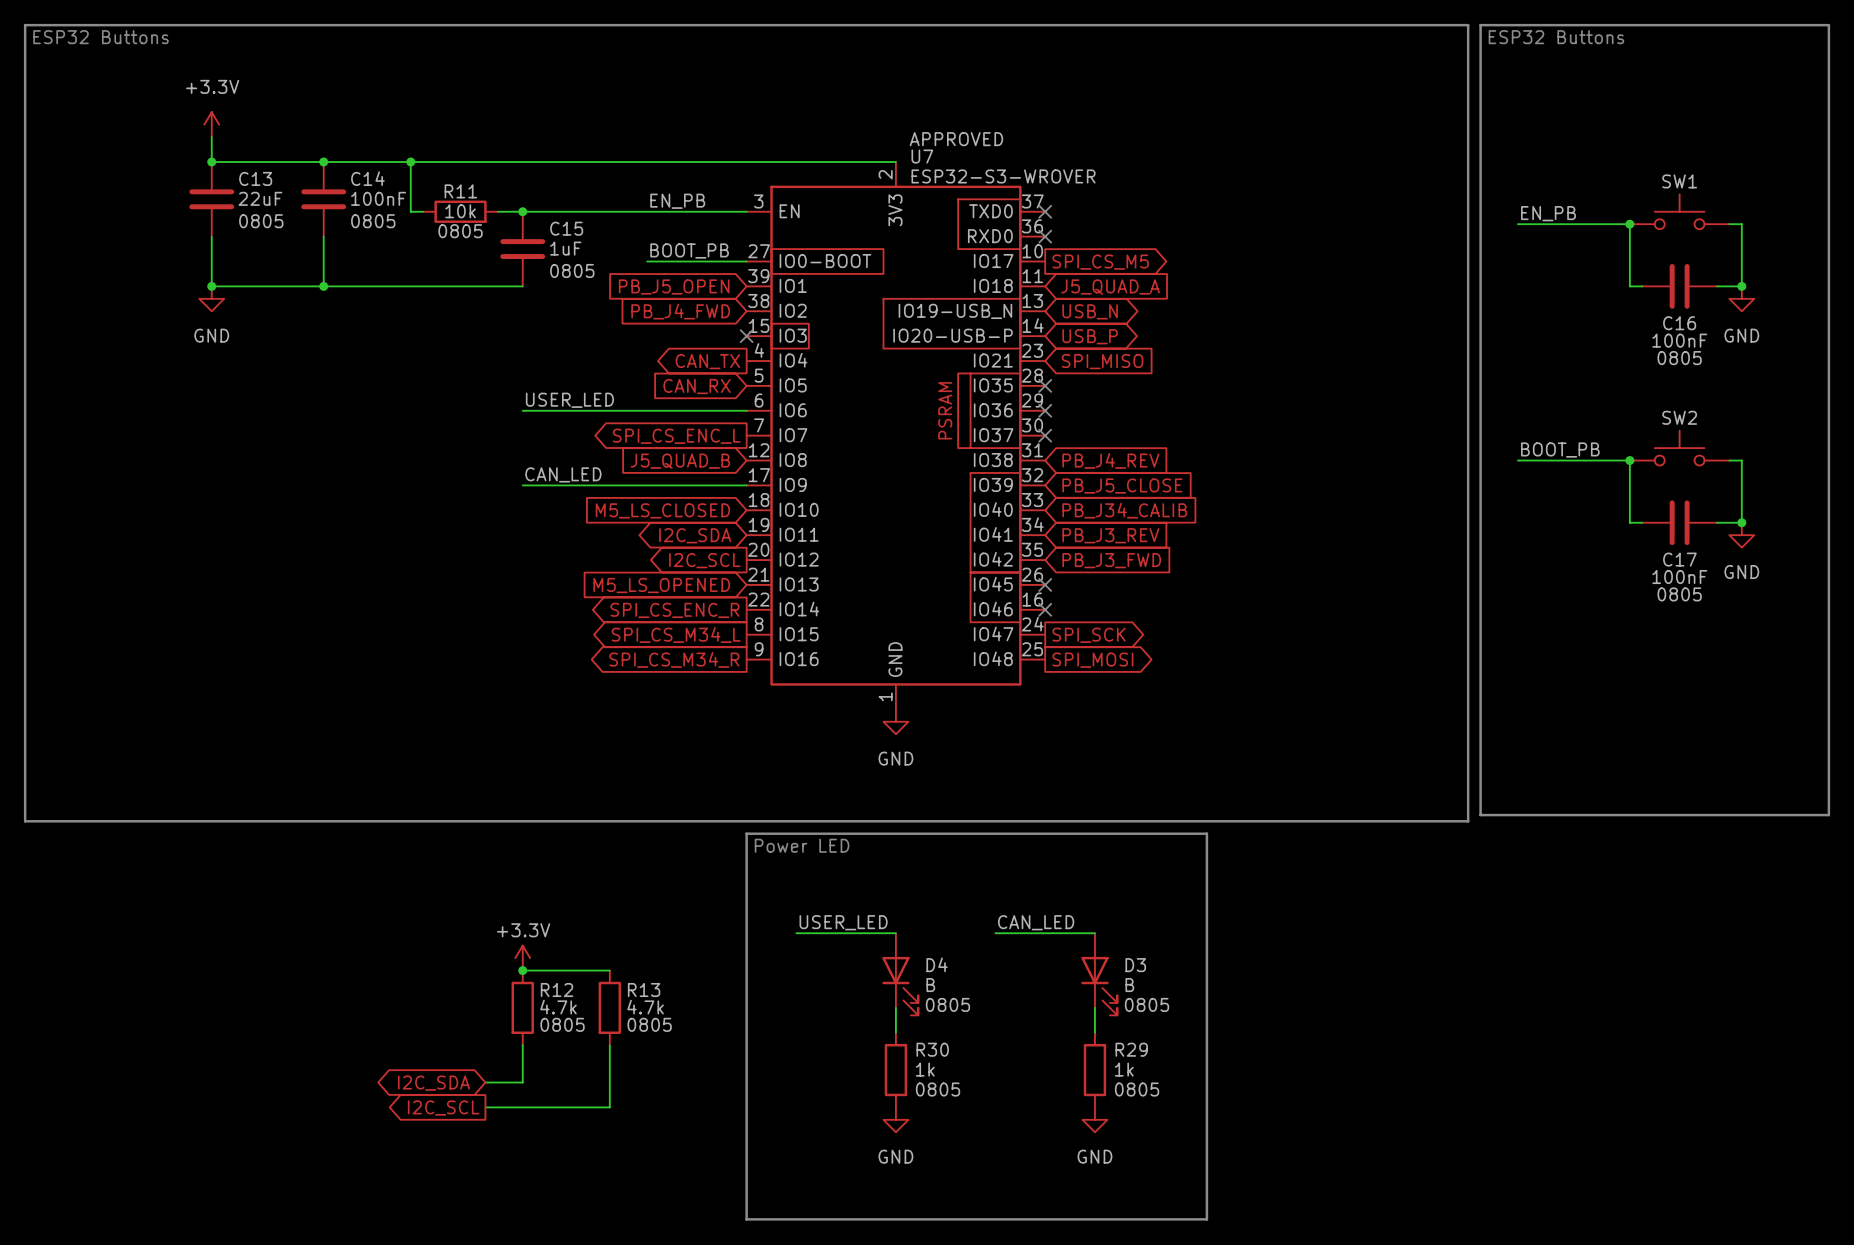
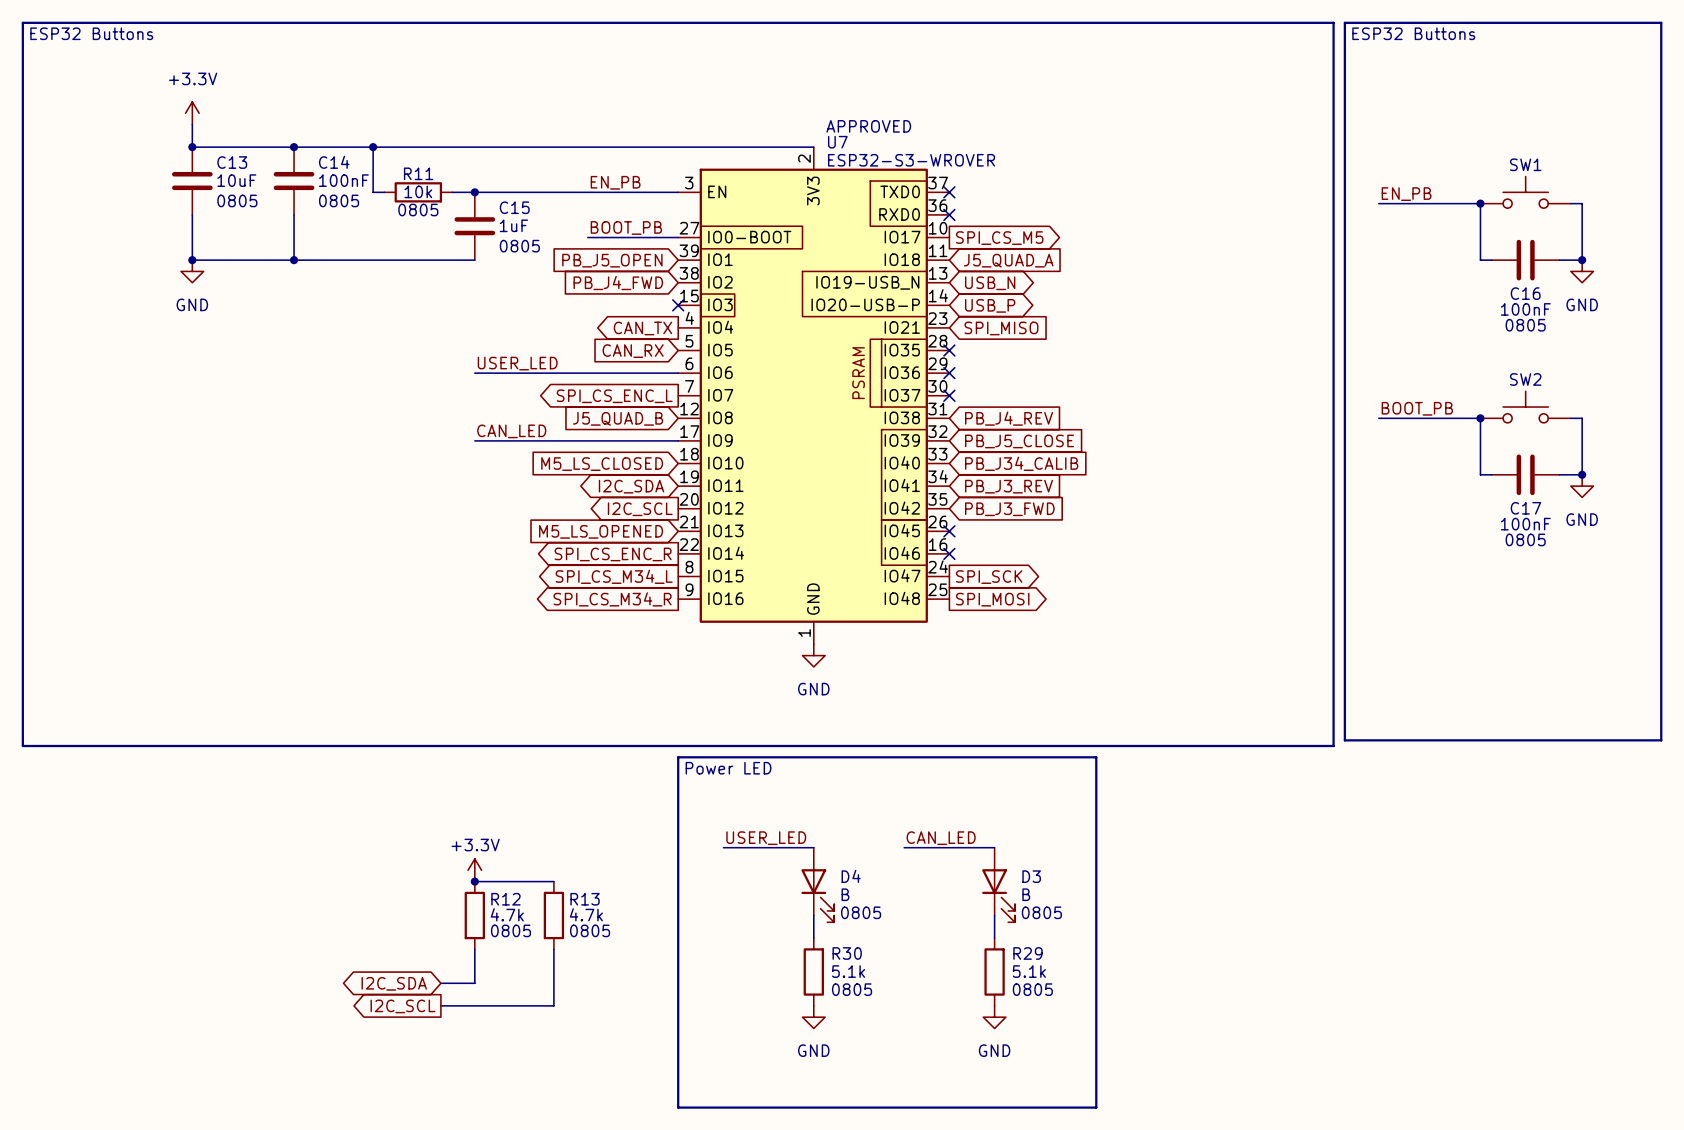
C13 value: 22uF (260, 198) -> 10uF (236, 180)
R30 value: 1k (925, 1069) -> 5.1k (848, 971)
R29 value: 1k (1124, 1069) -> 5.1k (1029, 971)

